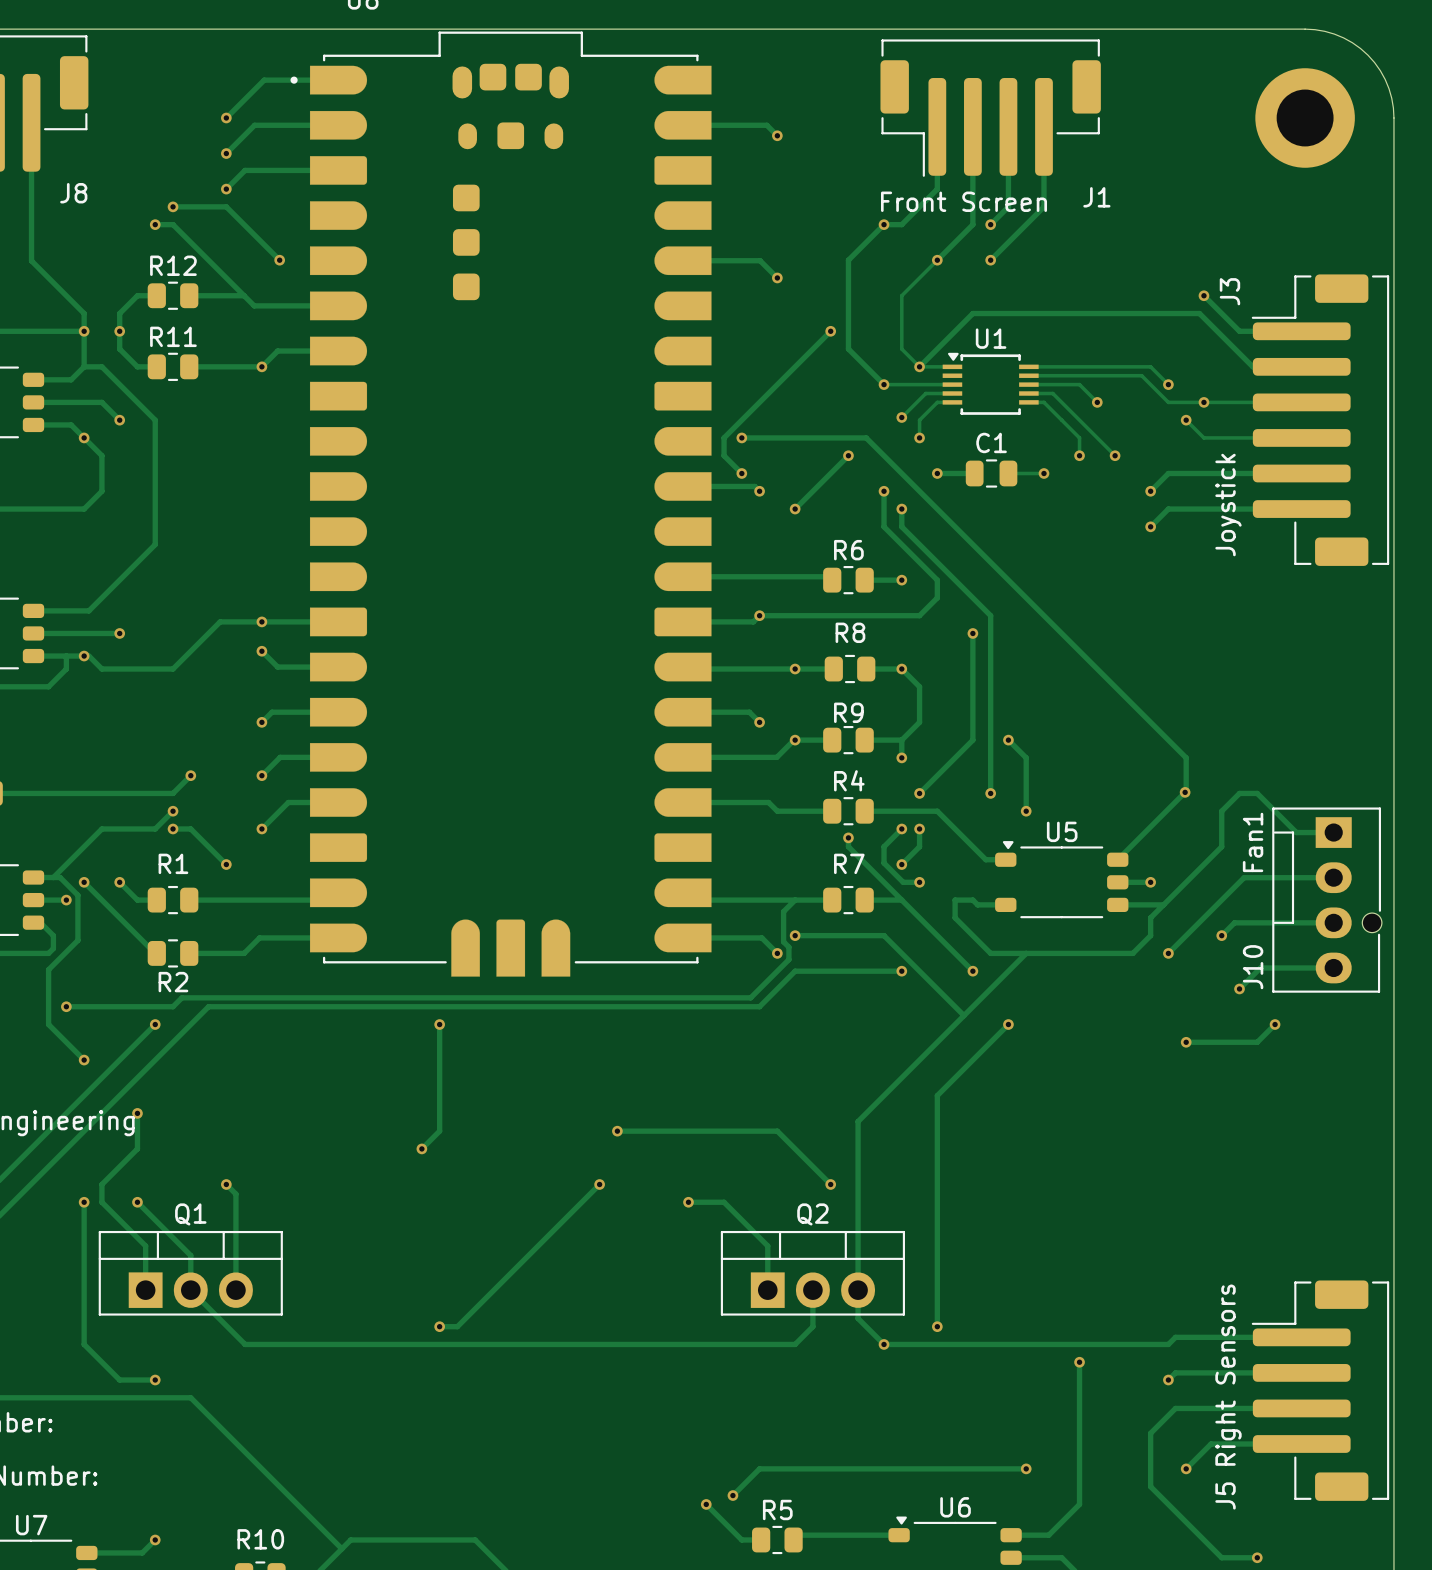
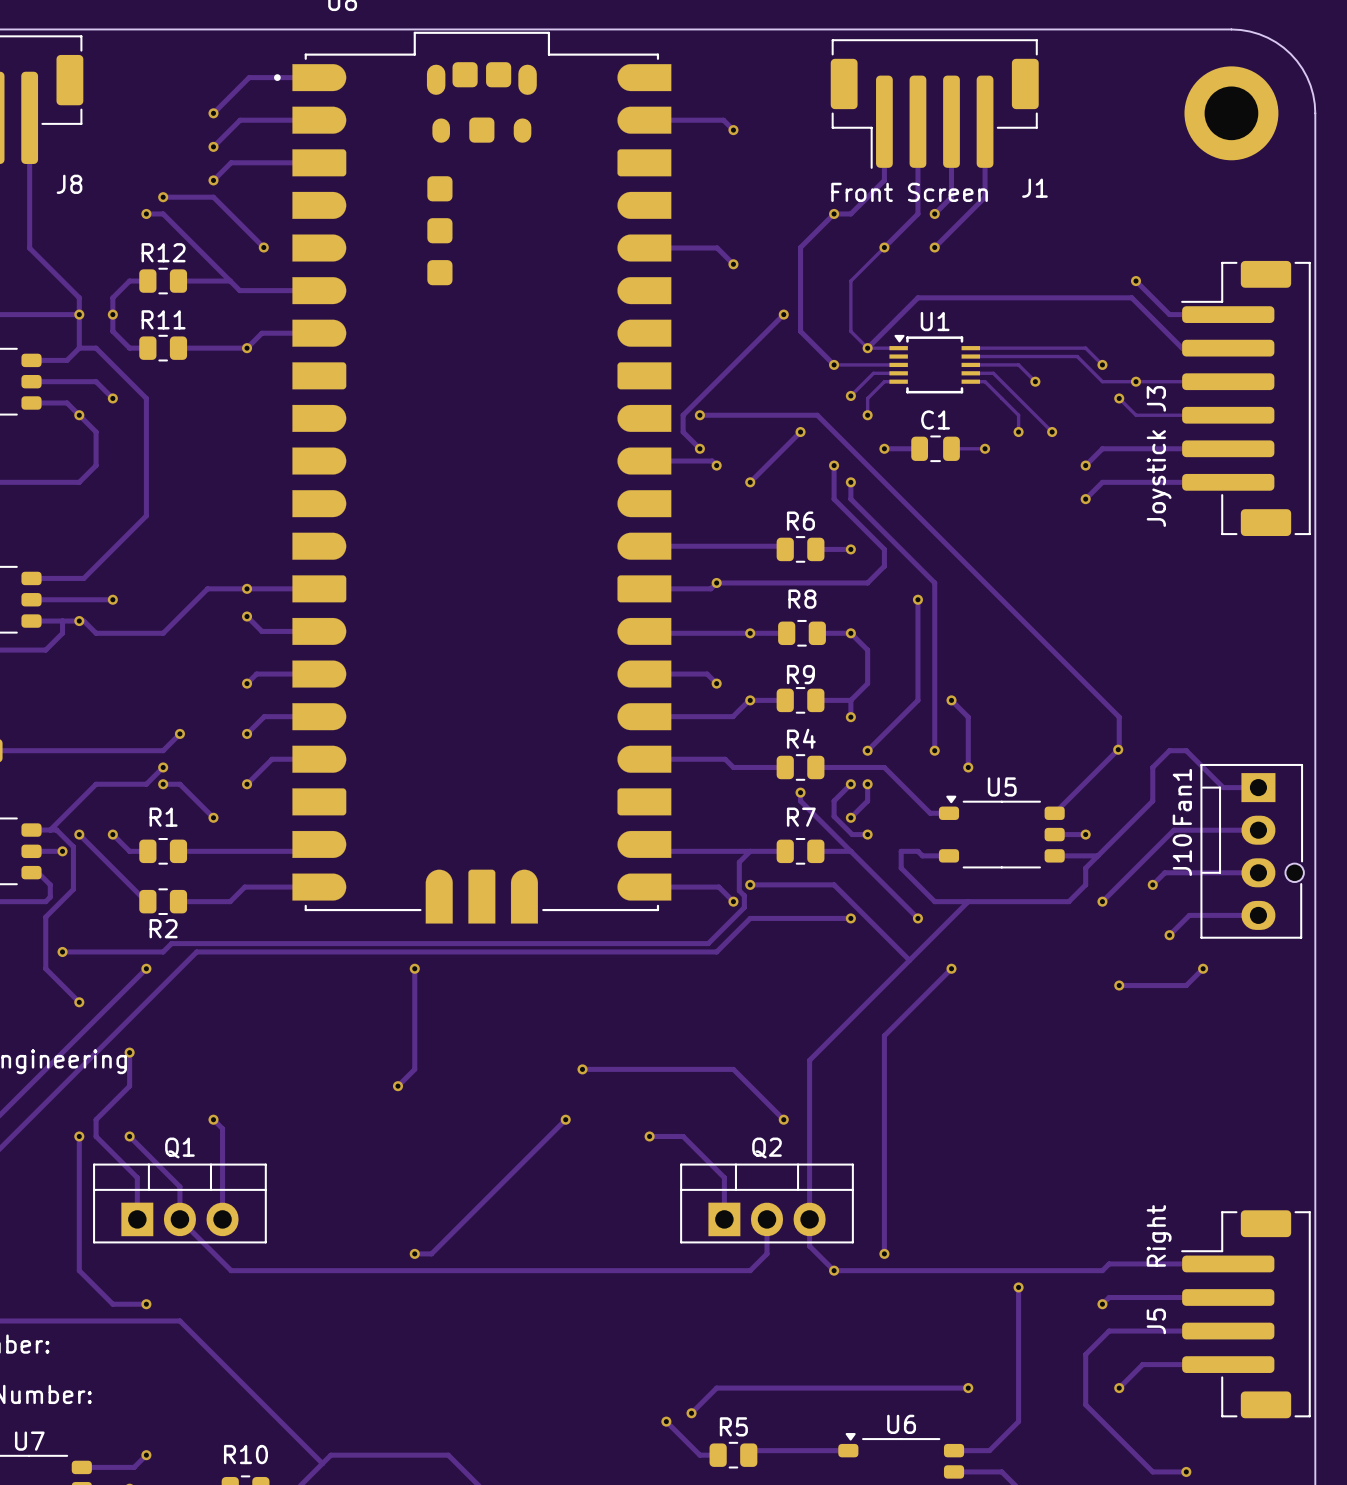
J3 name position: J3 (1229, 291) -> J3 (1156, 398)
J10 name position: J10 (1253, 967) -> J10 (1182, 855)
J5 text: Right Sensors (1228, 1375) -> Right (1159, 1235)
J5 name position: J5 (1225, 1495) -> J5 (1156, 1321)

